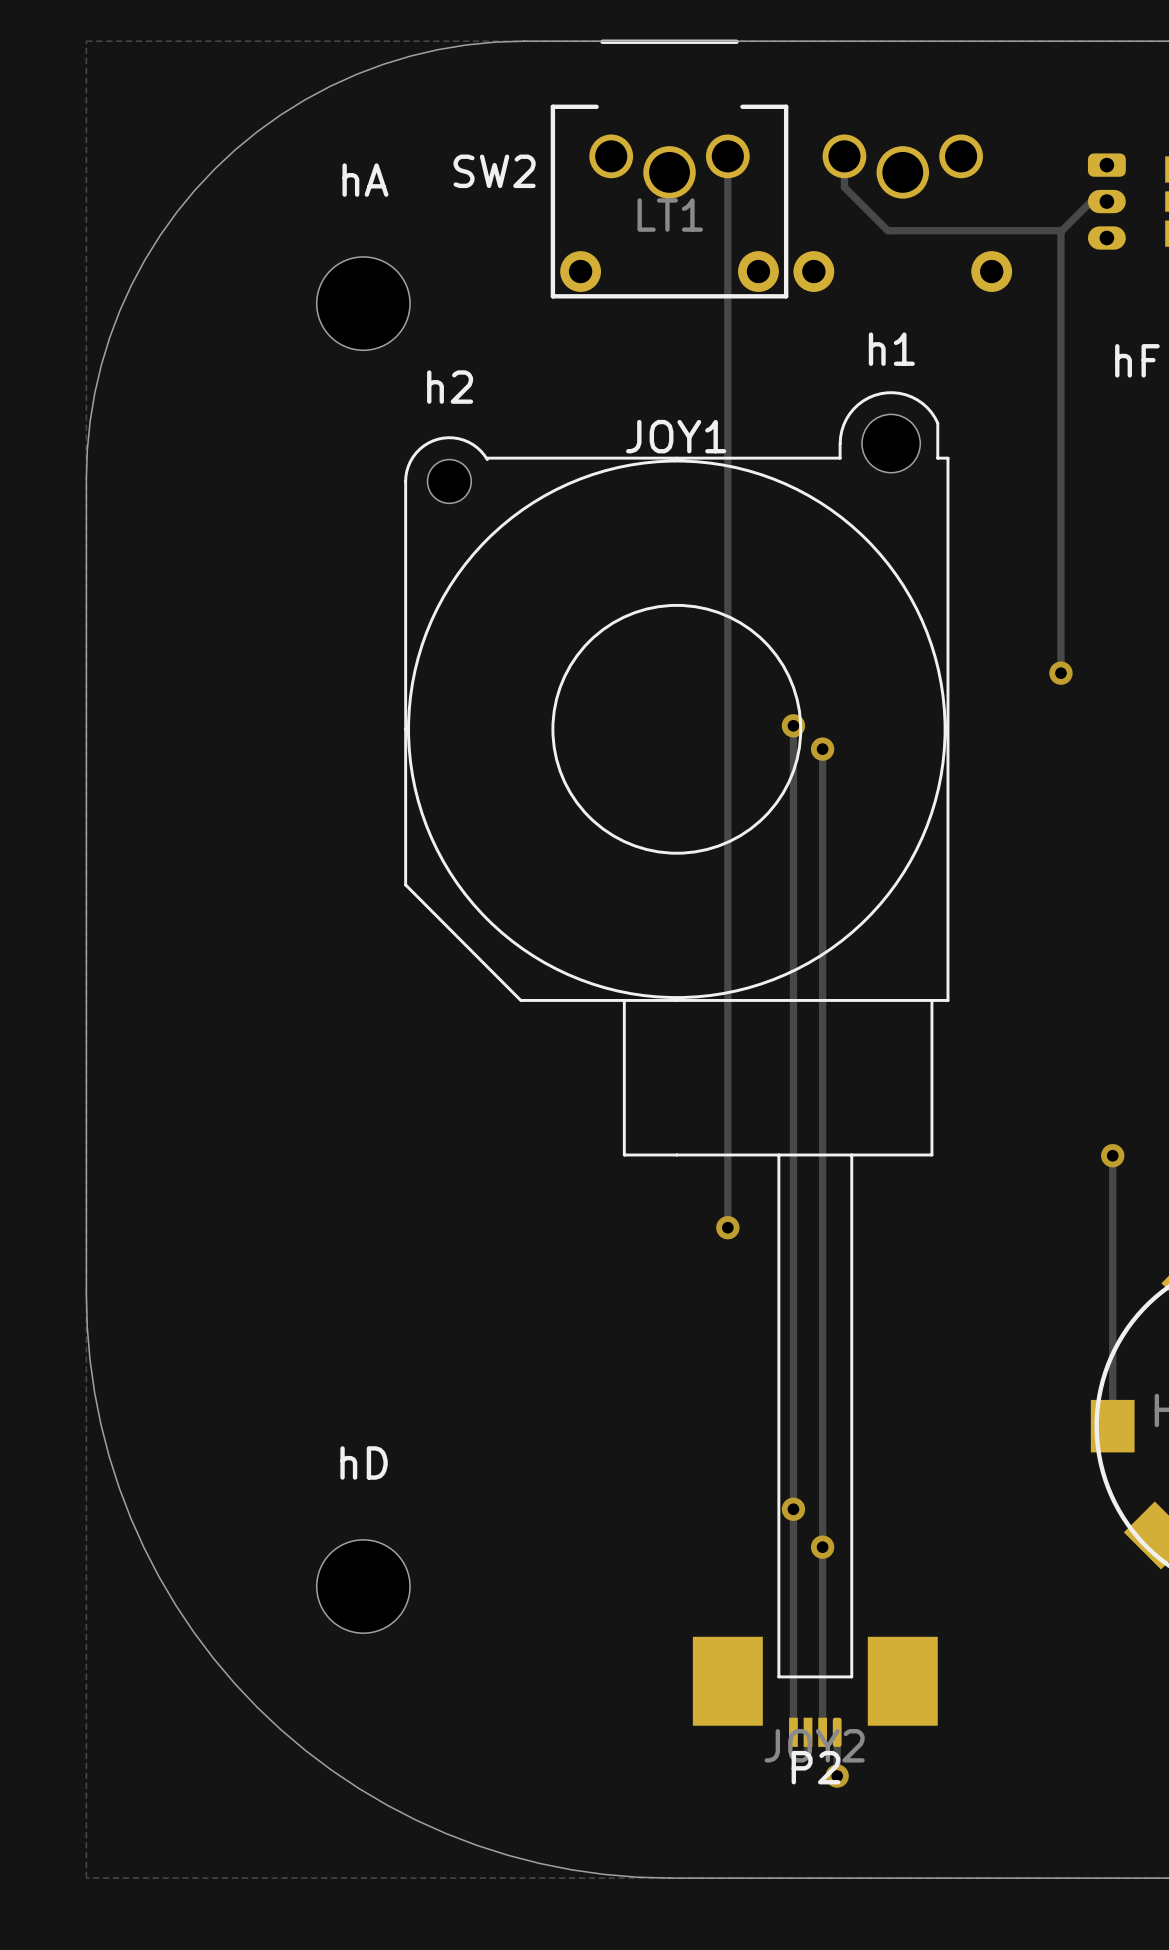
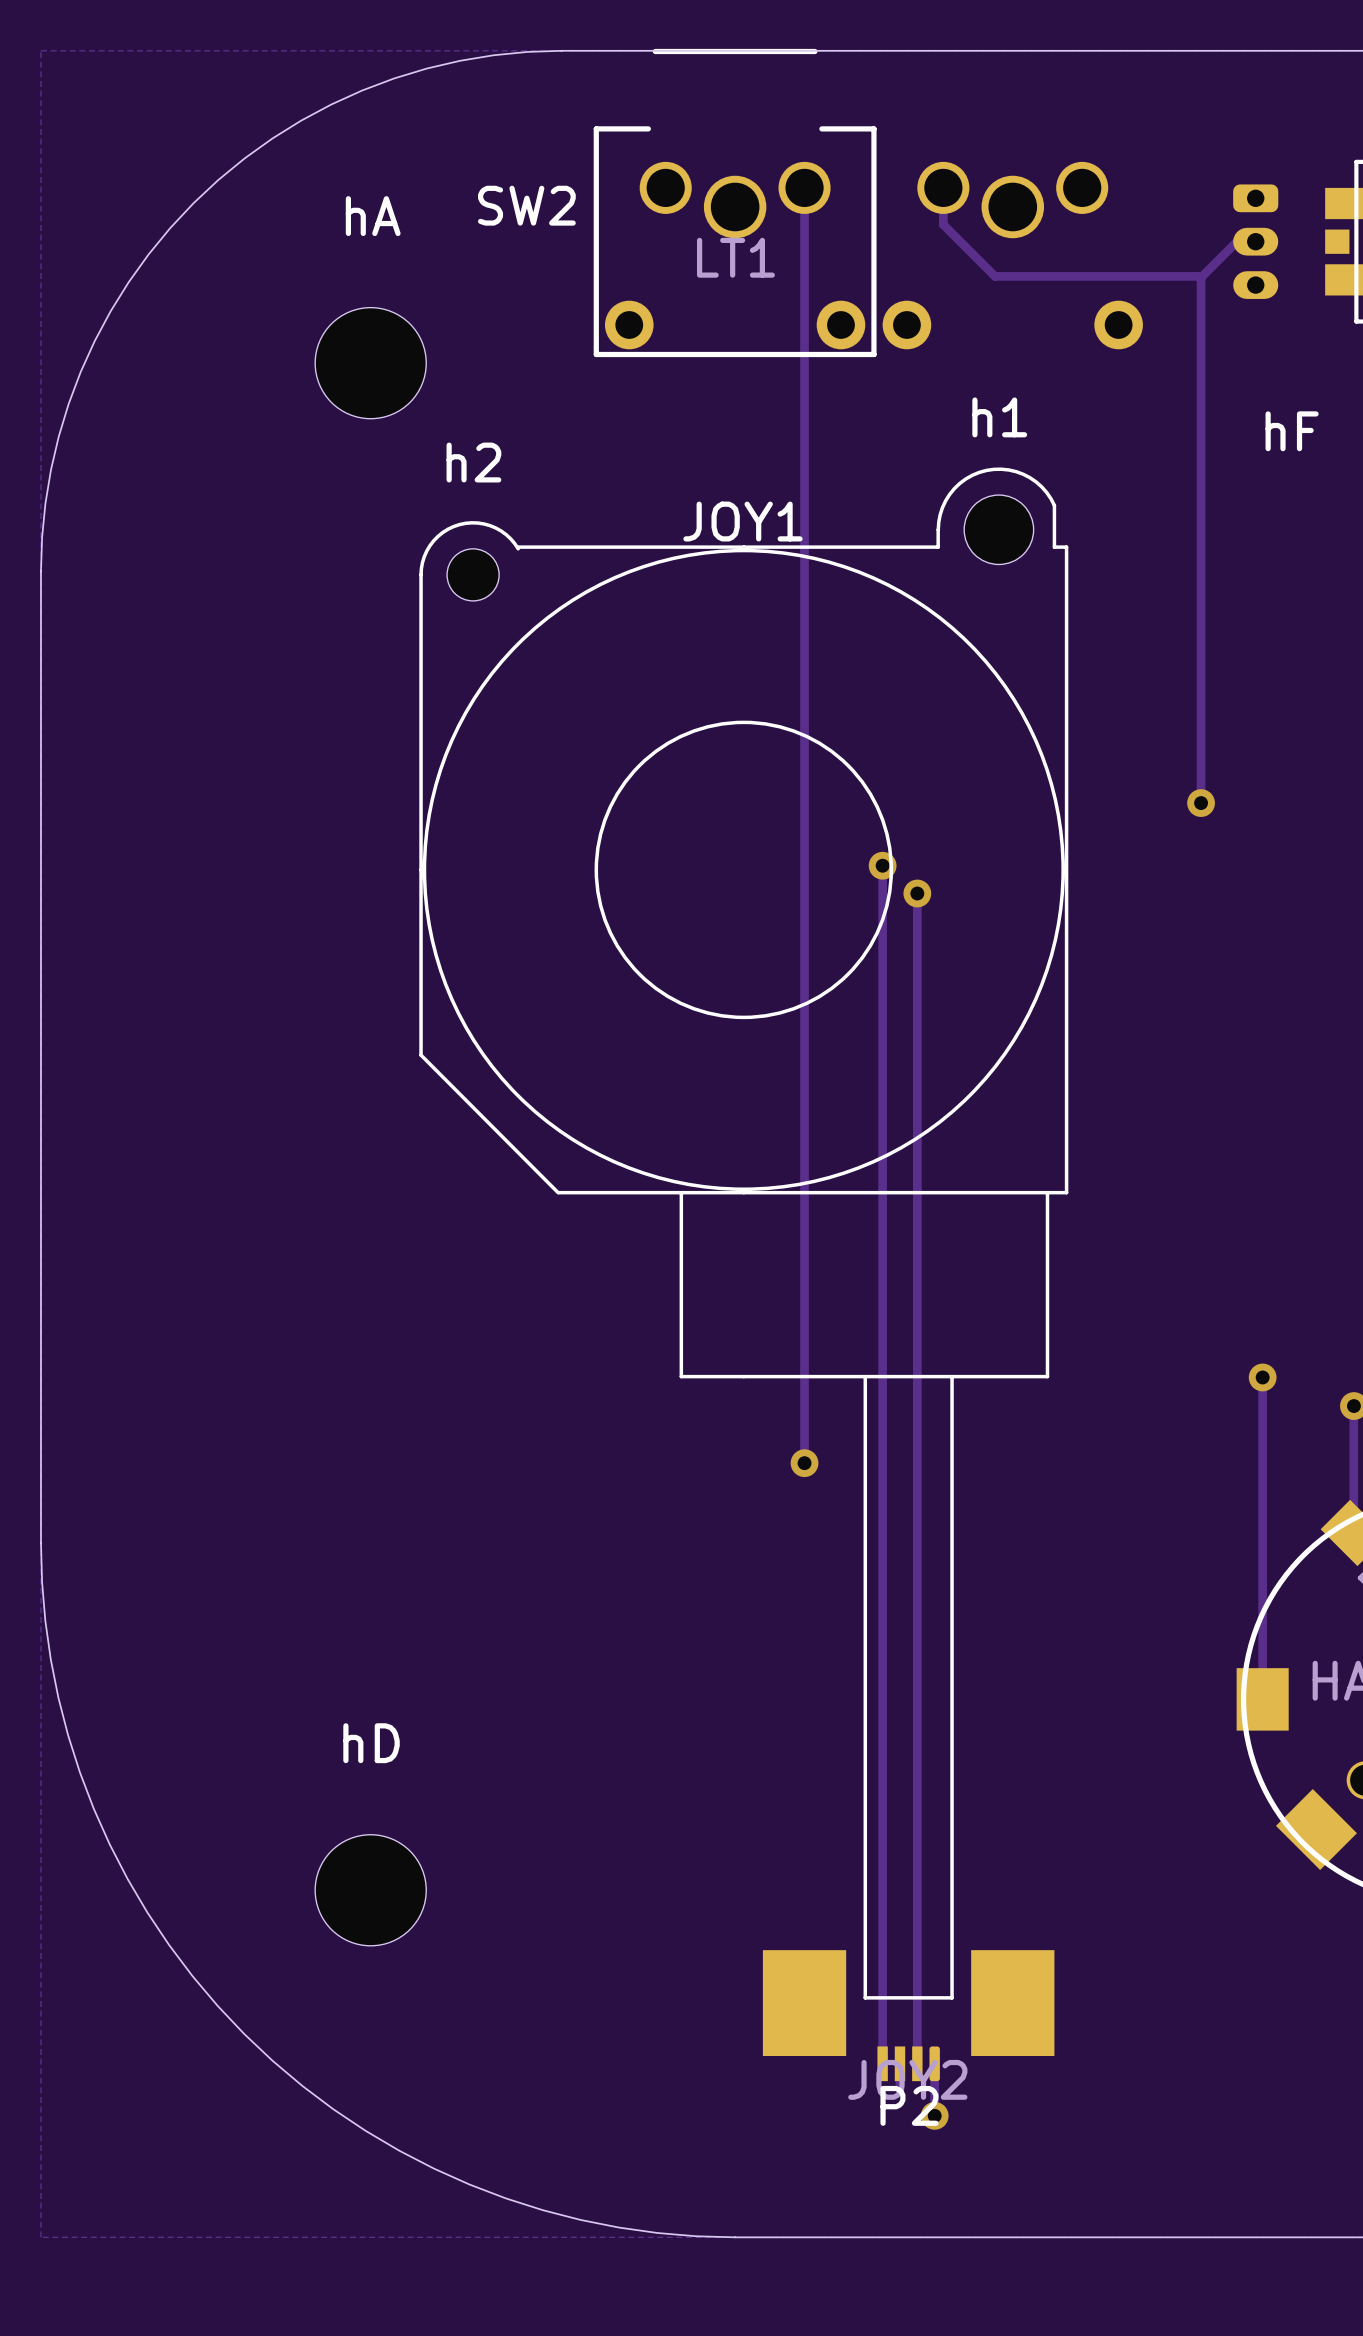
via: (793, 1509) -> none
via: (822, 1547) -> none

